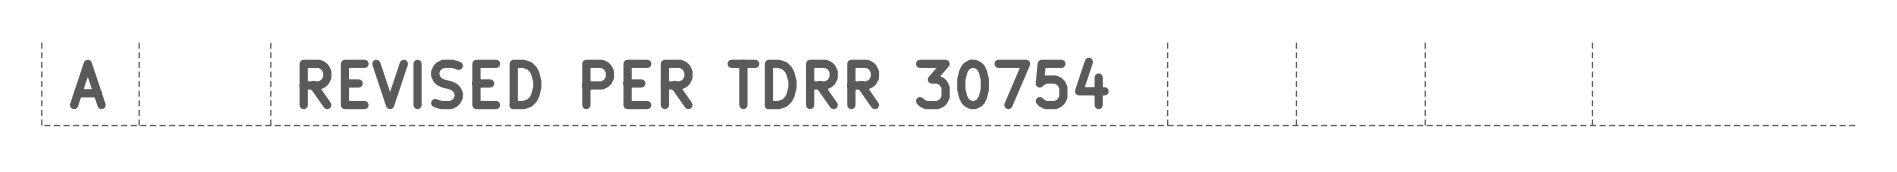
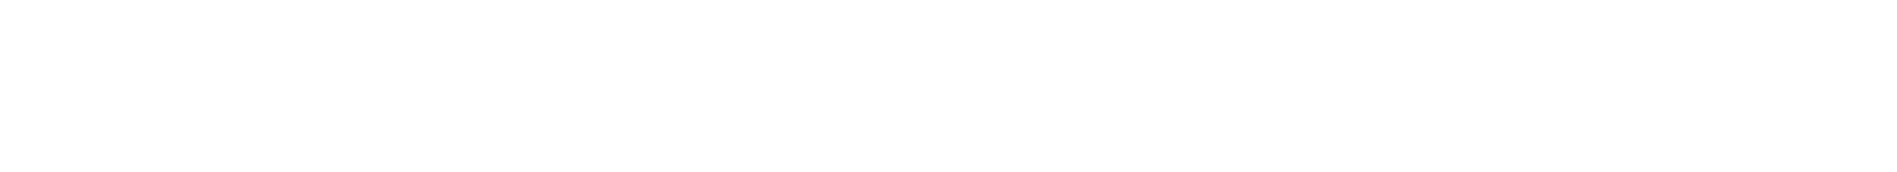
line: (41, 41) (41, 125) (1855, 125) -> none
line: (139, 41) (139, 125) -> none
line: (270, 41) (270, 125) -> none
line: (1167, 41) (1167, 125) -> none
line: (1296, 41) (1296, 125) -> none
line: (1425, 41) (1425, 125) -> none
line: (1592, 41) (1592, 125) -> none
text: A REVISED PER TDRR 30754 (589, 83) -> none

